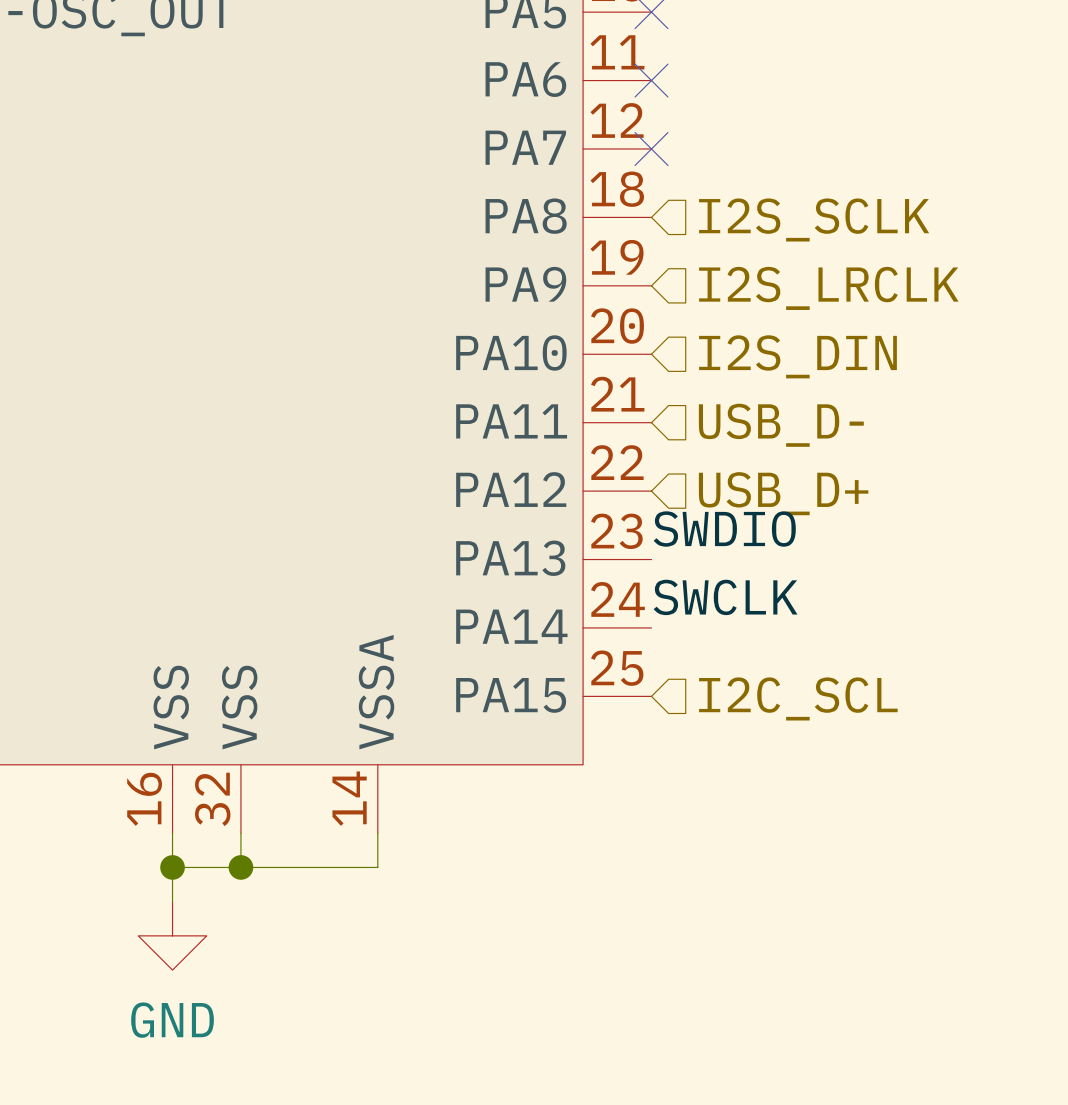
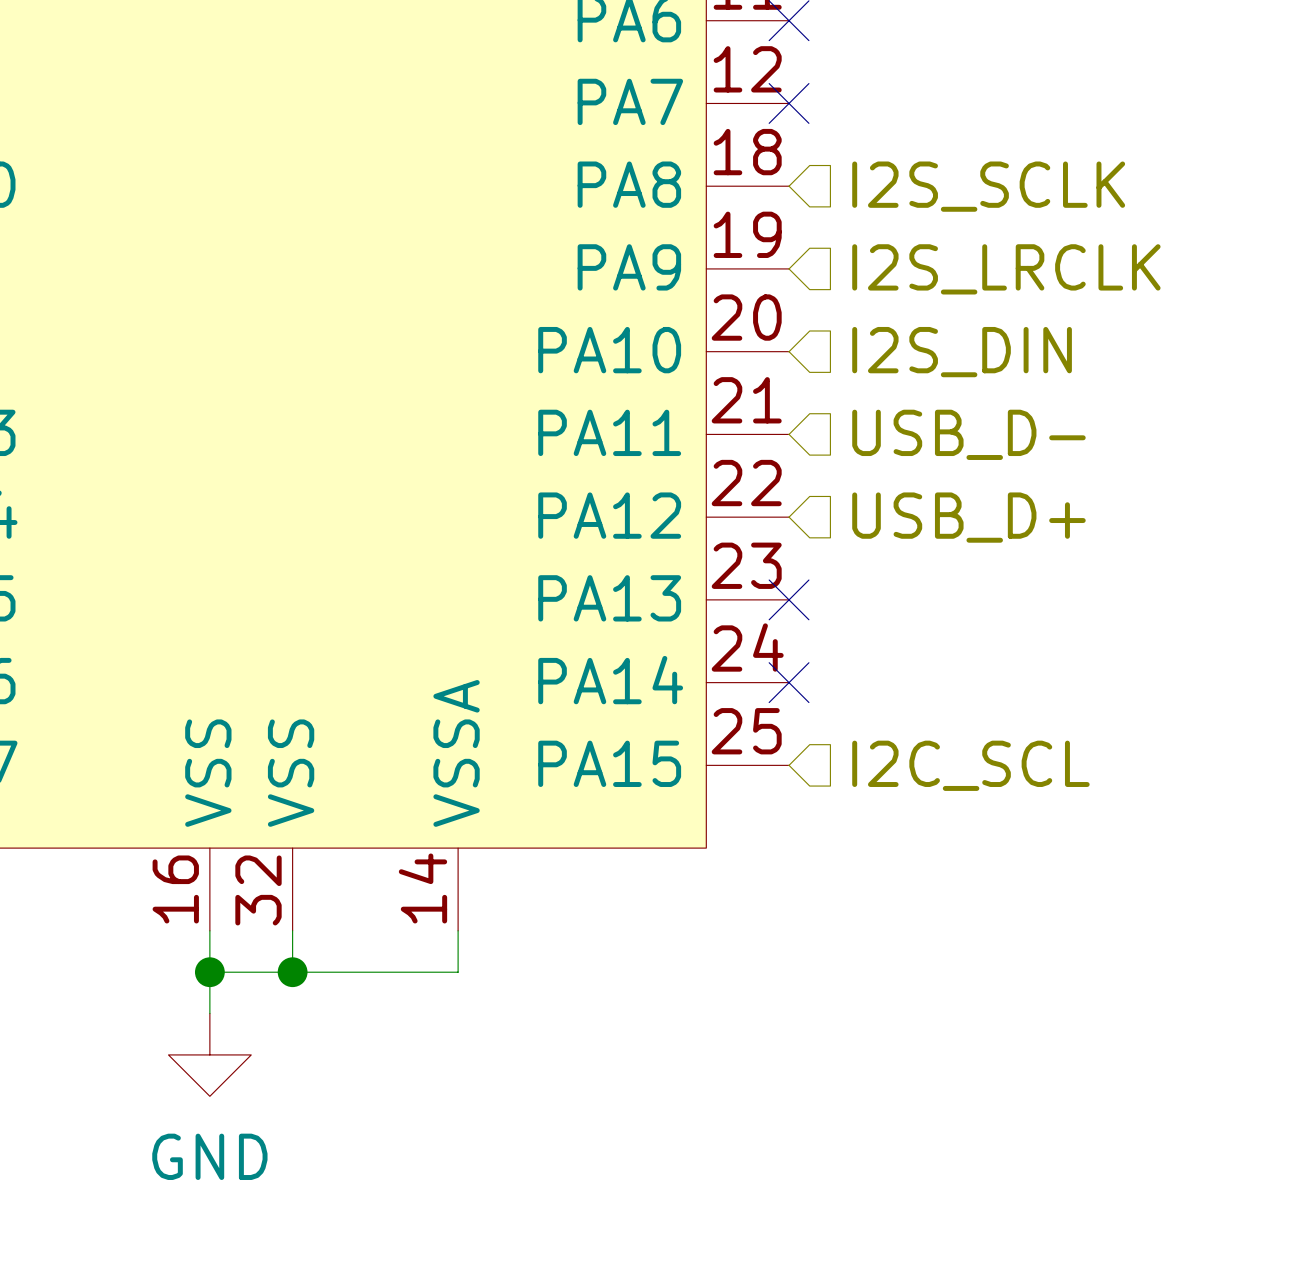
label: SWDIO (724, 529) -> none
no-connect mark: none -> (789, 599)
label: SWCLK (725, 597) -> none
no-connect mark: none -> (789, 682)

